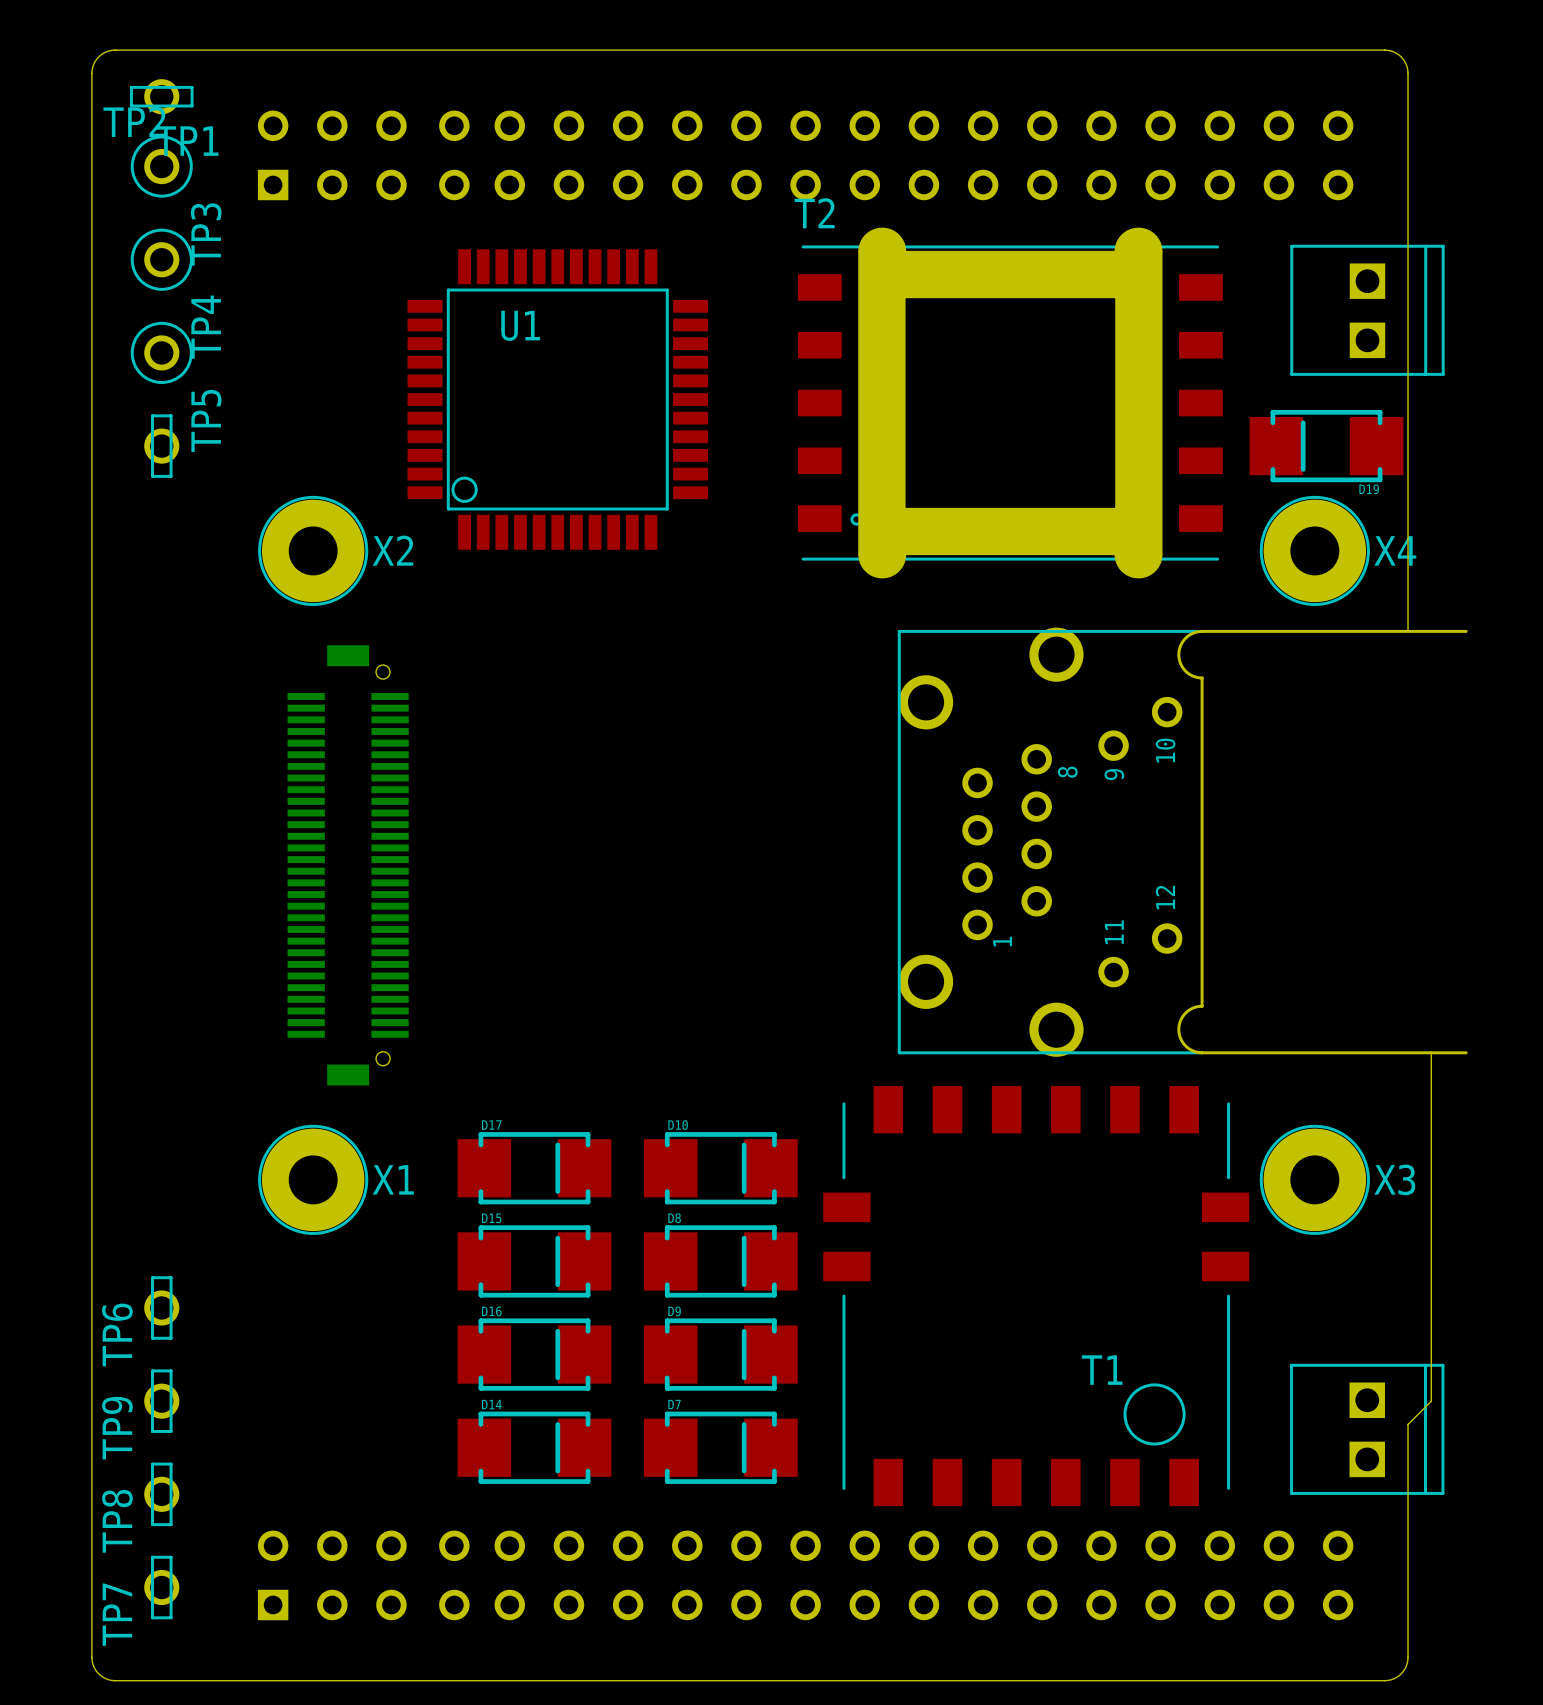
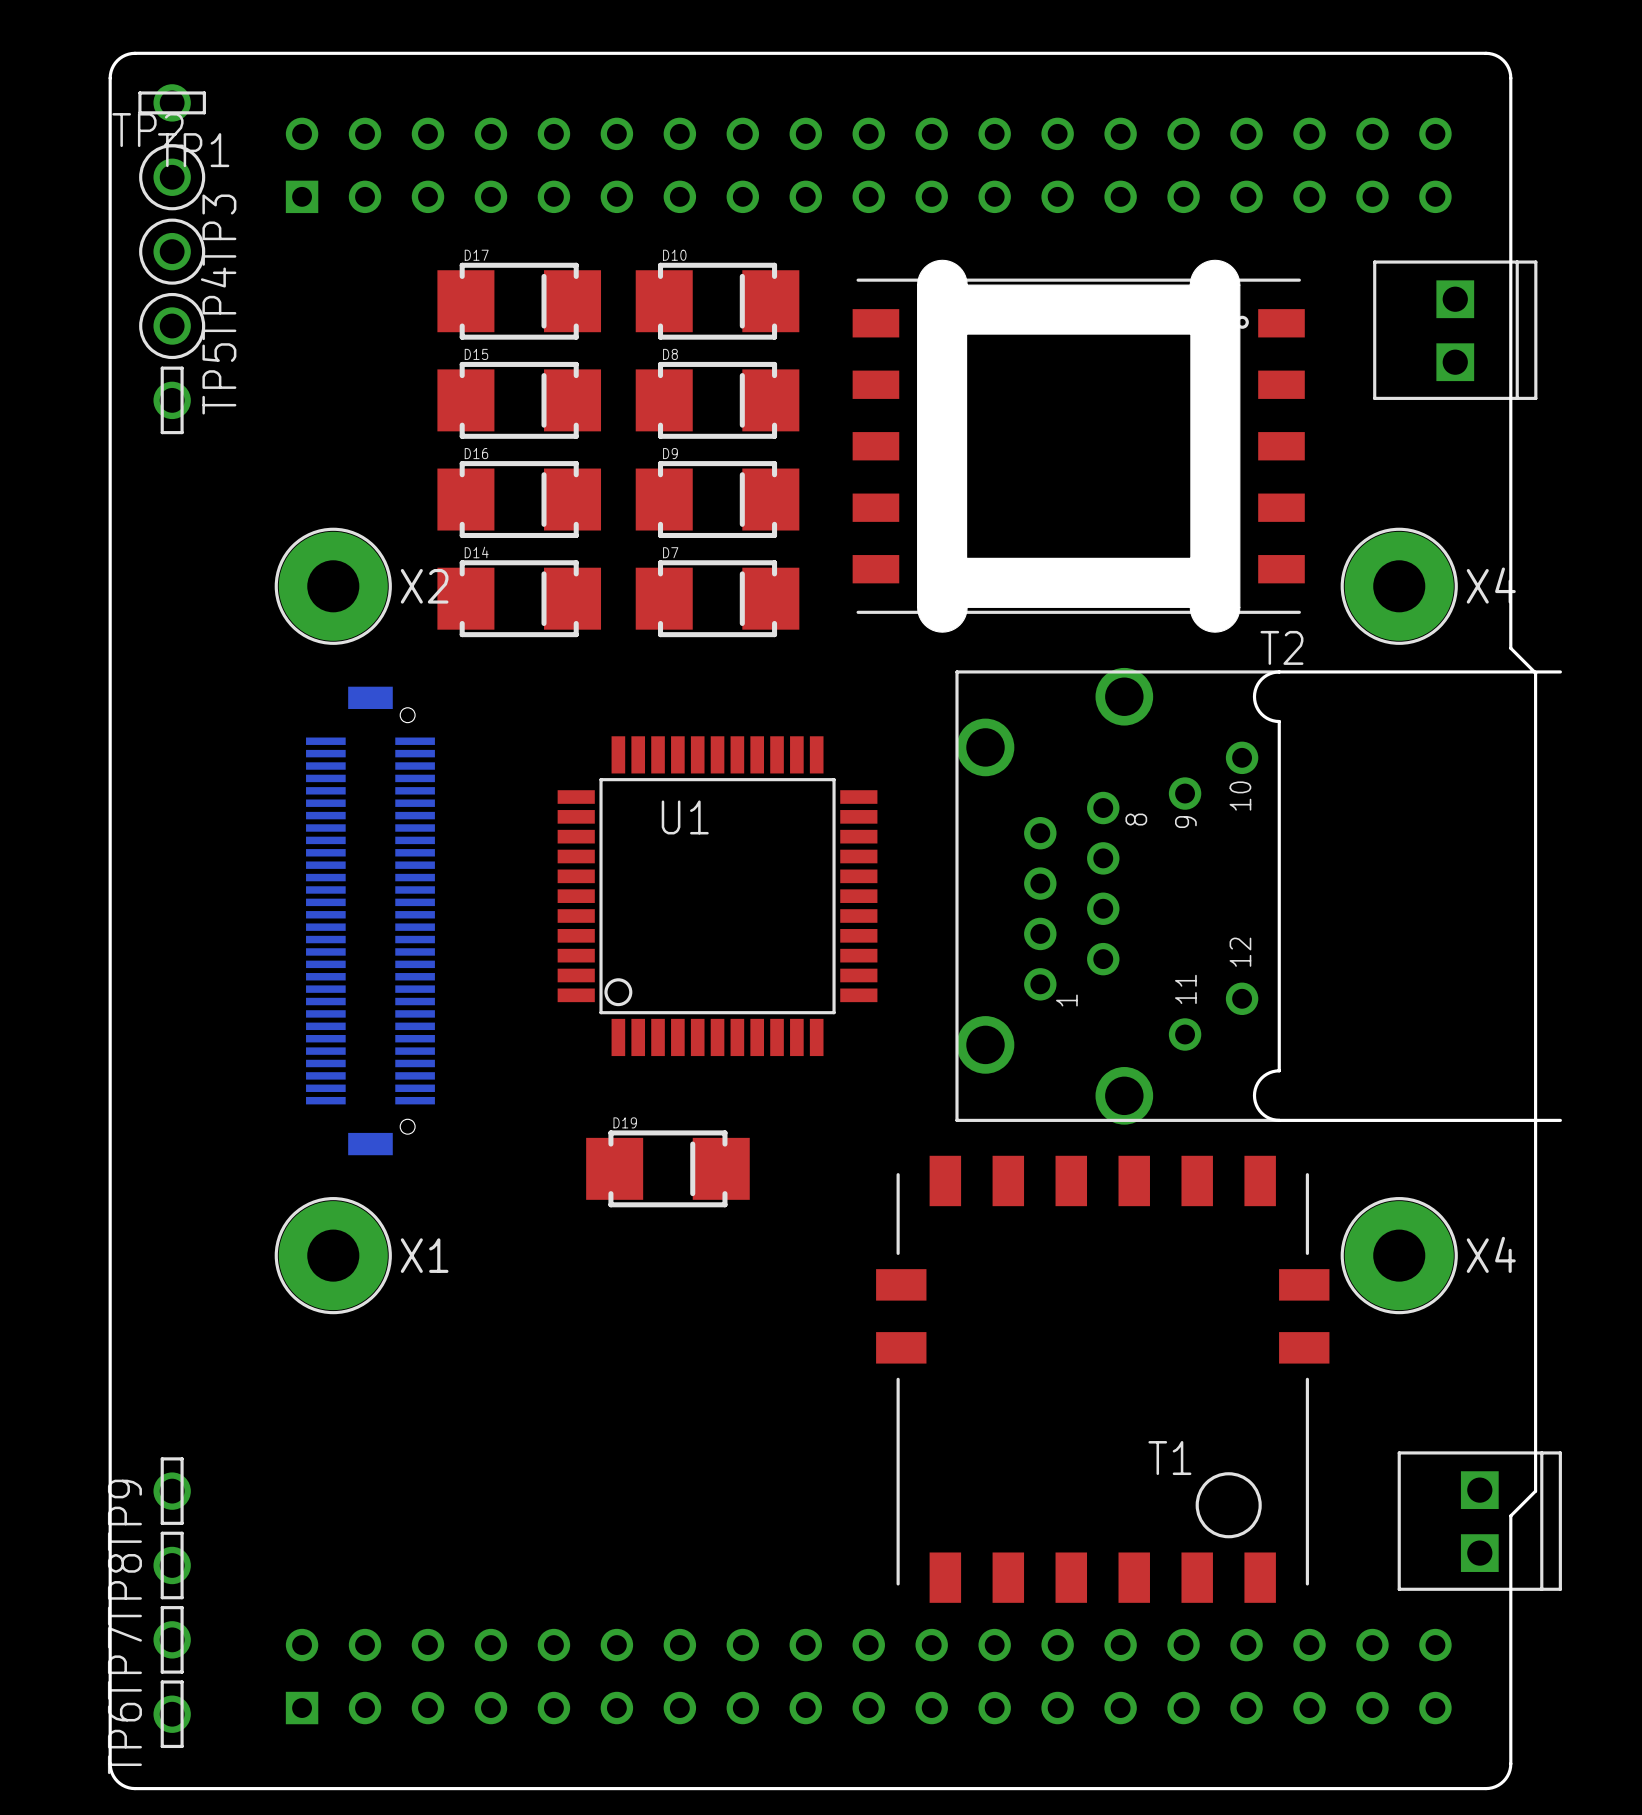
part: (805, 155) -> none
TP3 position: (161, 259) -> (172, 251)
TP4 position: (161, 352) -> (172, 326)
U1 position: (557, 399) -> (717, 896)
T2 rotation: 0° (1010, 403) -> 180° (1078, 446)
TP5 position: (161, 446) -> (172, 400)
D19 rotation: 0° (1326, 446) -> 180° (667, 1168)
D19 position: (1326, 446) -> (667, 1168)
board edge: (1408, 632) (1408, 73) (1403, 59) (1393, 51) (1384, 50) (115, 50) (101, 54) (93, 64) (91, 73) (91, 1657) (93, 1666) (101, 1675) (115, 1680) (1384, 1680) (1393, 1678) (1403, 1671) (1408, 1657) (1408, 1424) (1431, 1401) (1431, 1051) -> none
part: none -> (822, 920)
D17 position: (534, 1168) -> (519, 301)
D10 position: (720, 1168) -> (717, 301)
X3 name: X3 (1394, 1179) -> X4 (1491, 1254)
D15 position: (534, 1261) -> (519, 400)
D8 position: (720, 1261) -> (717, 400)
TP6 position: (161, 1307) -> (172, 1714)
D16 position: (534, 1354) -> (519, 499)
D9 position: (720, 1354) -> (717, 499)
part position: (1367, 1429) -> (1479, 1521)
D14 position: (534, 1447) -> (519, 598)
D7 position: (720, 1447) -> (717, 598)
TP8 position: (161, 1494) -> (172, 1565)
part: (805, 1575) -> none
TP7 position: (161, 1587) -> (172, 1639)

